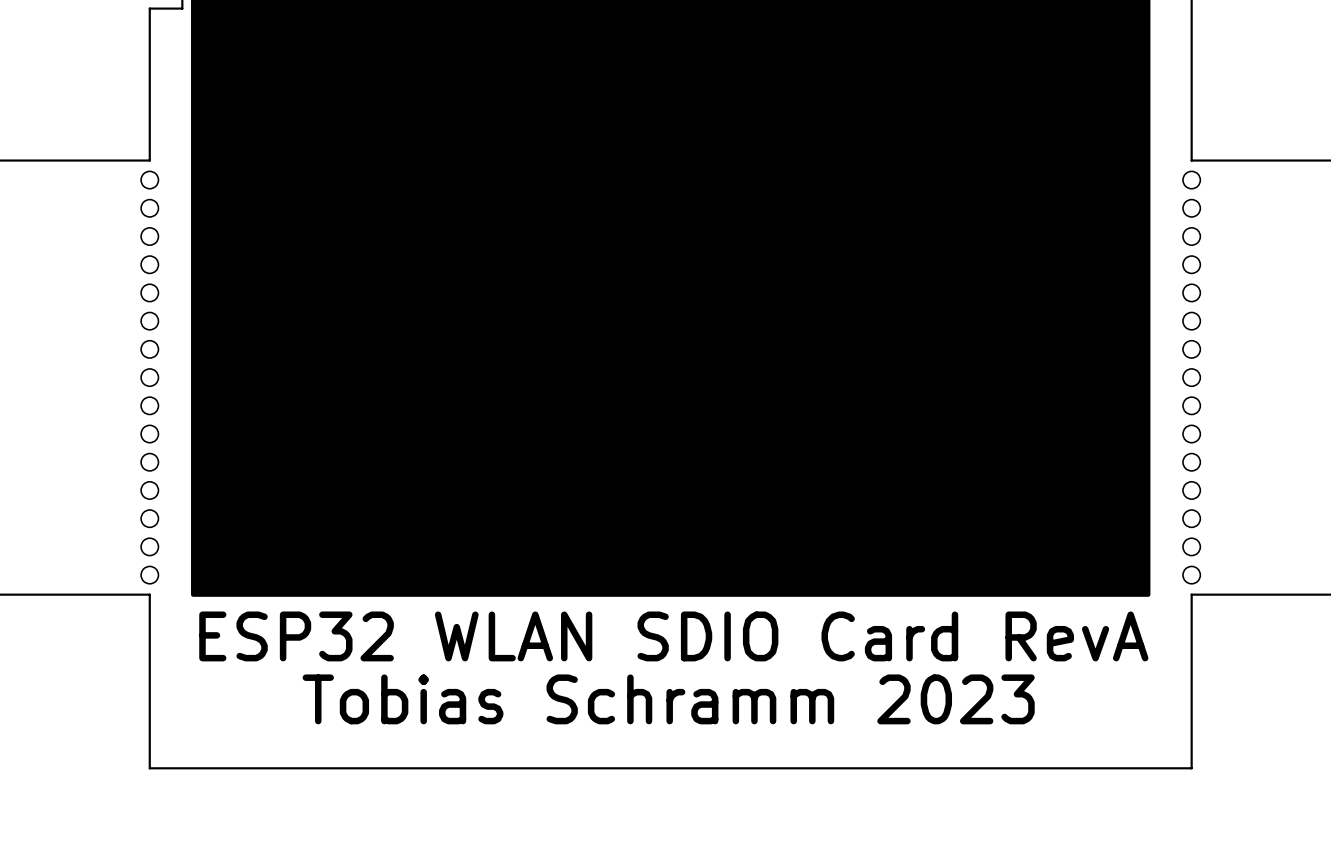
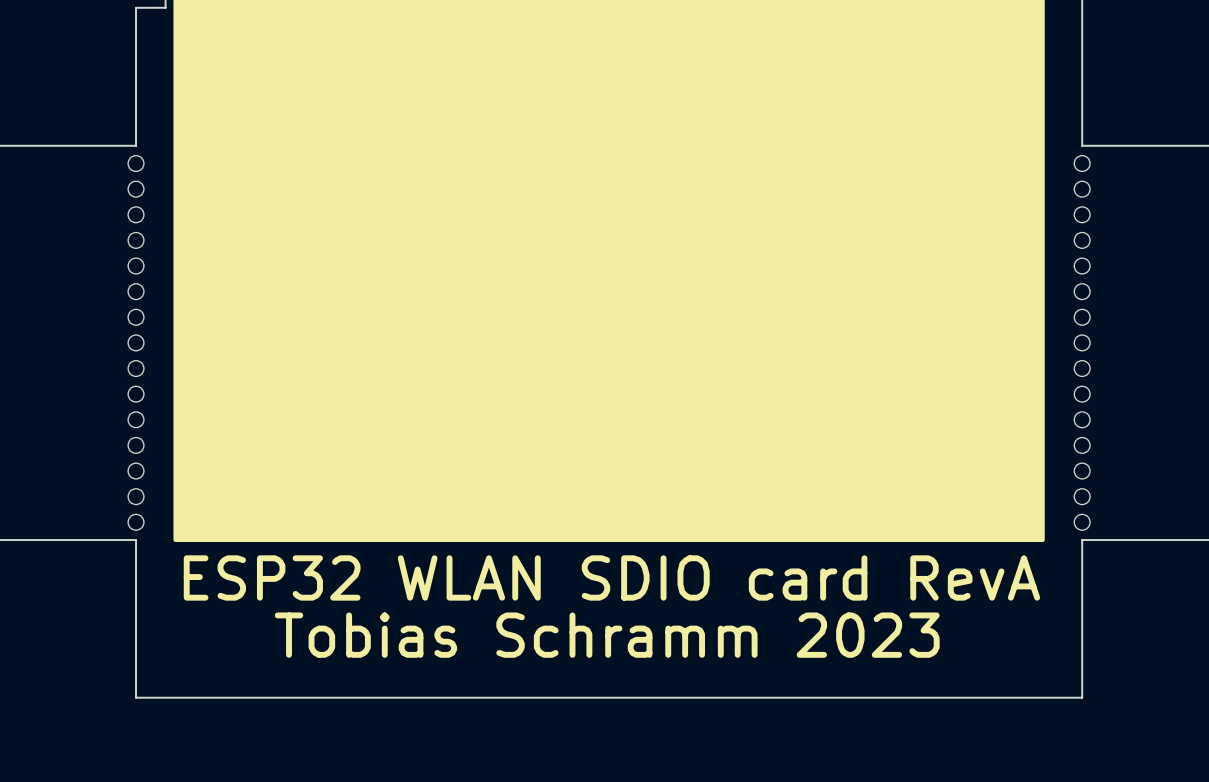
text: ESP32 WLAN SDIO Card RevA (673, 636) -> ESP32 WLAN SDIO card RevA (611, 577)

